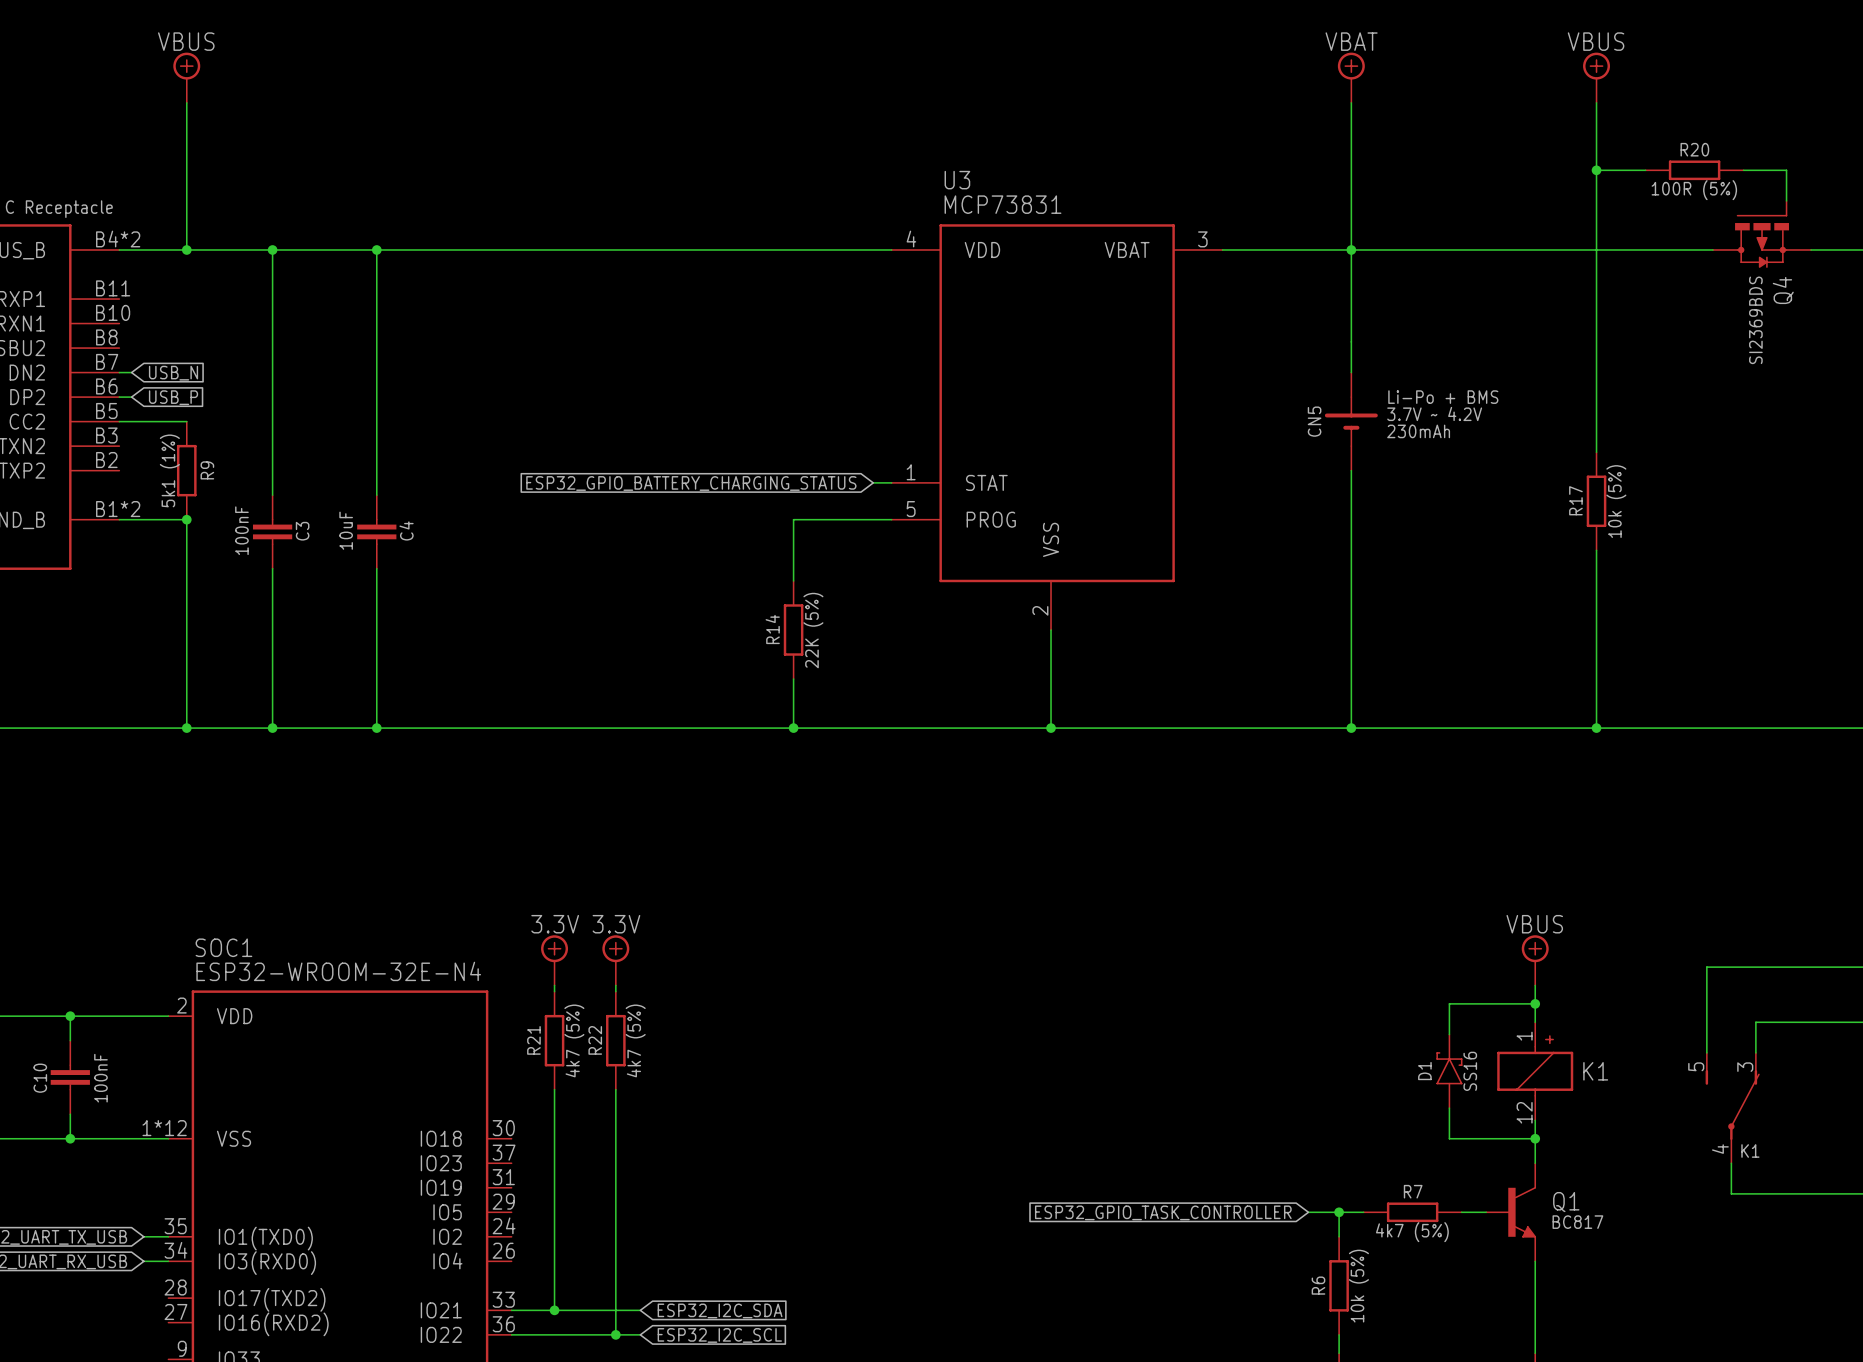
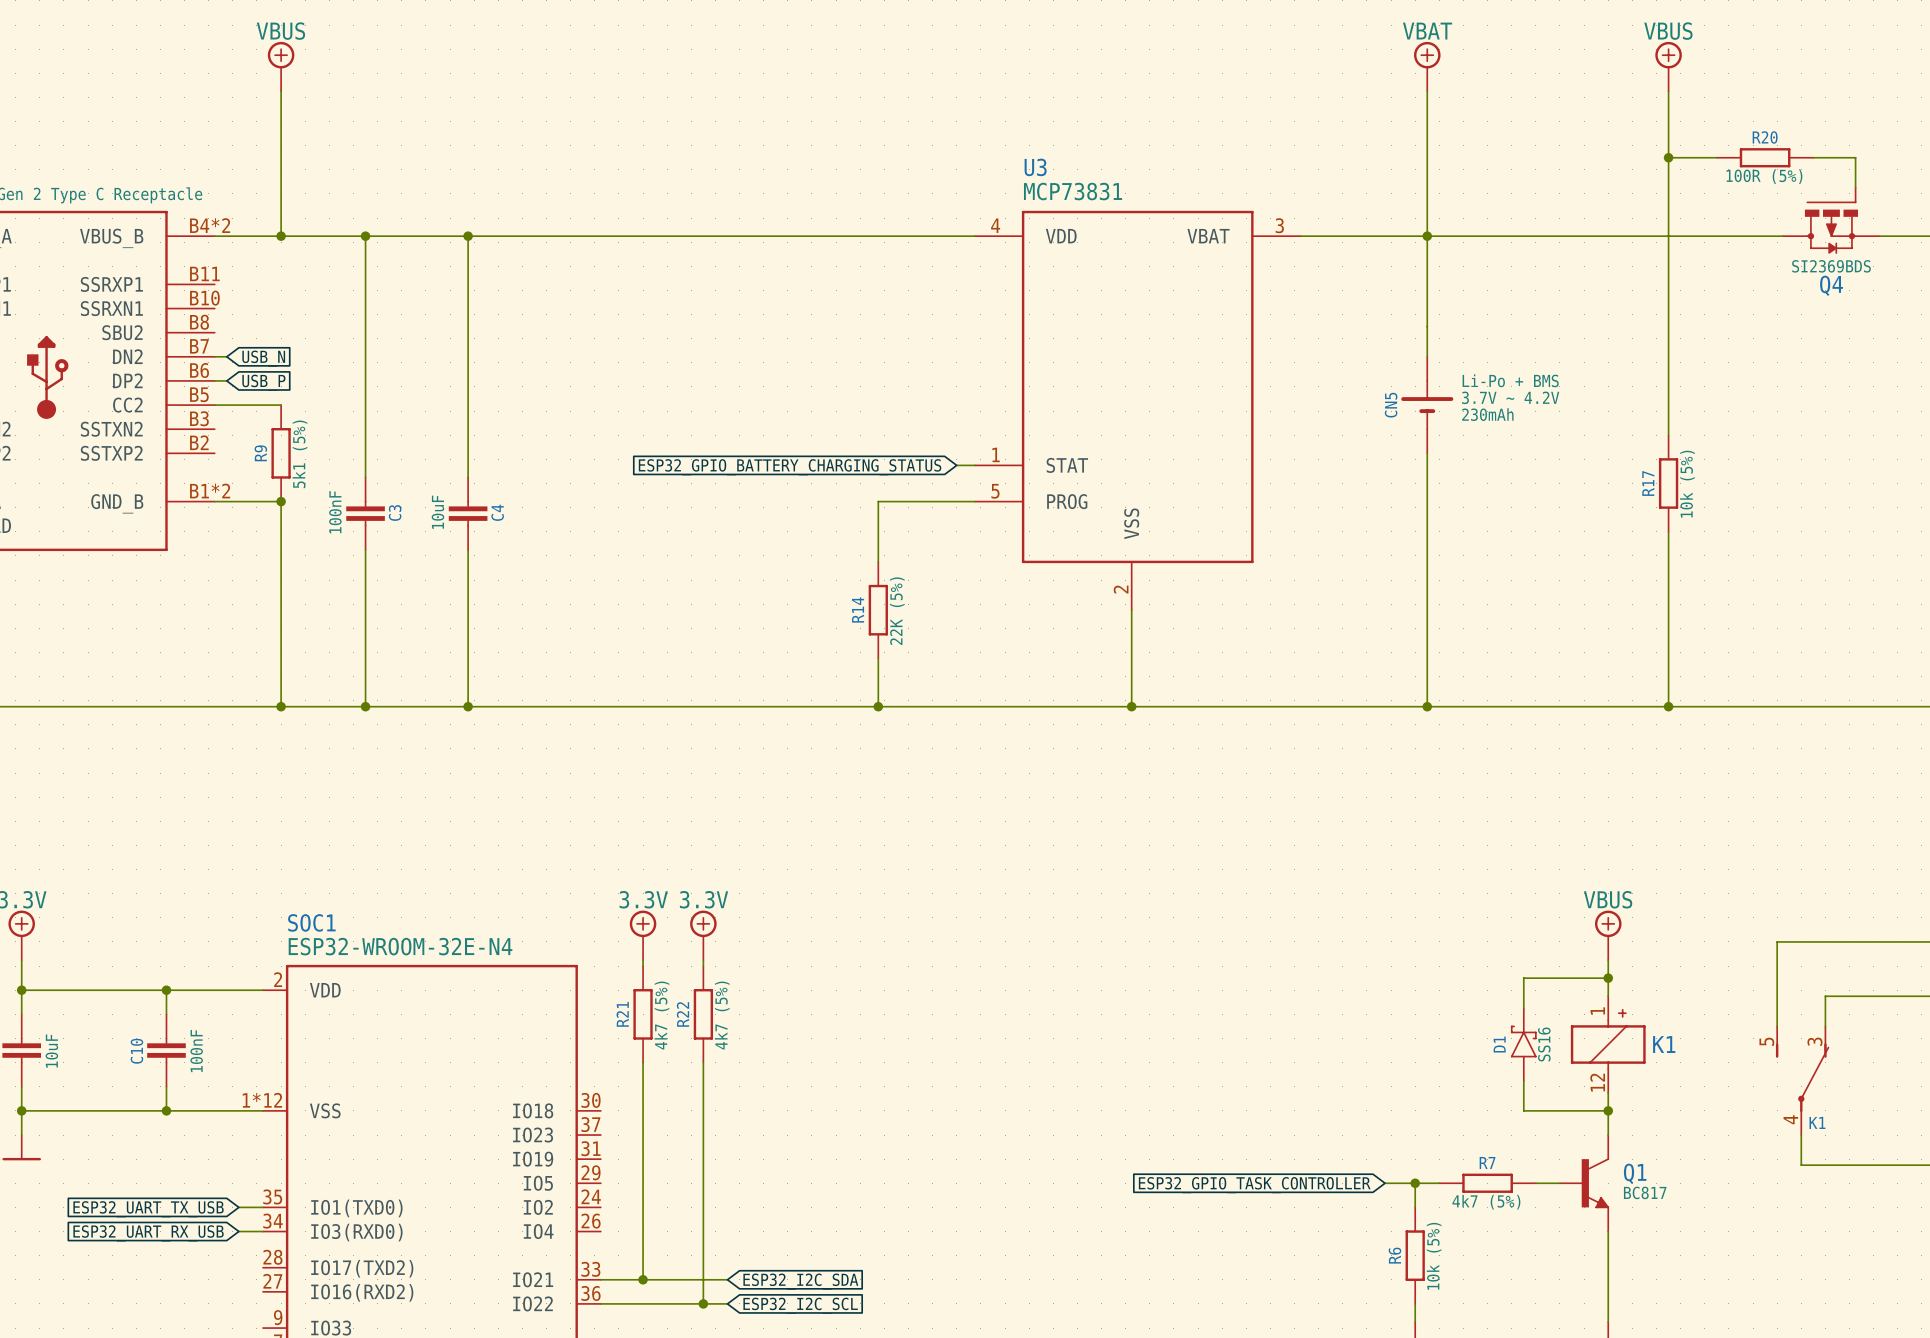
Q4 name rotation: 0° (1783, 290) -> 90° clockwise (1831, 285)
Q4 text rotation: 0° (1755, 320) -> 90° clockwise (1831, 266)
R9 value: 5k1 (1%) (169, 470) -> 5k1 (5%) (300, 454)
R9 name position: R9 (207, 470) -> R9 (260, 453)

